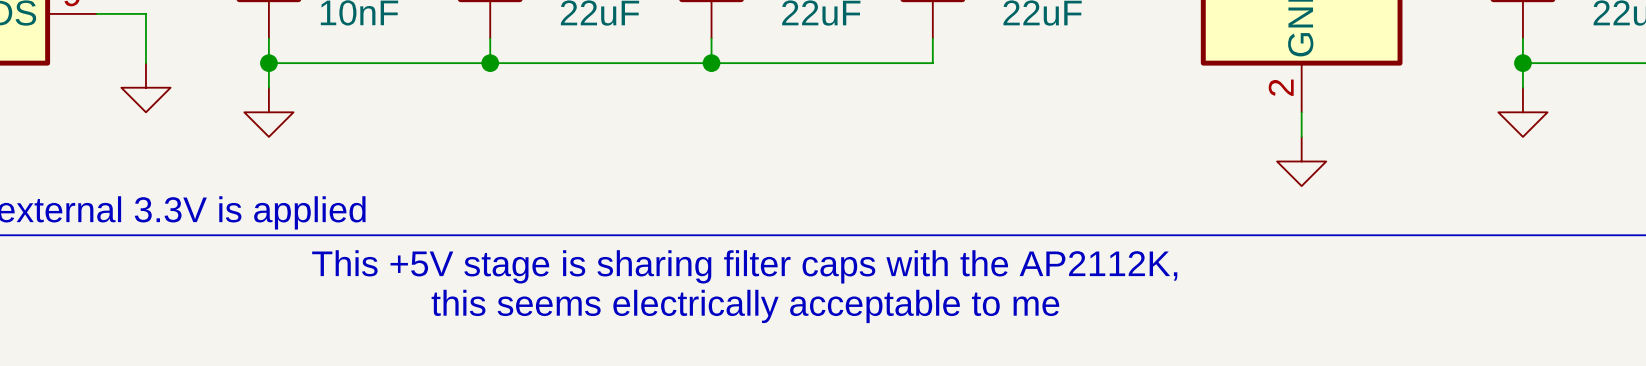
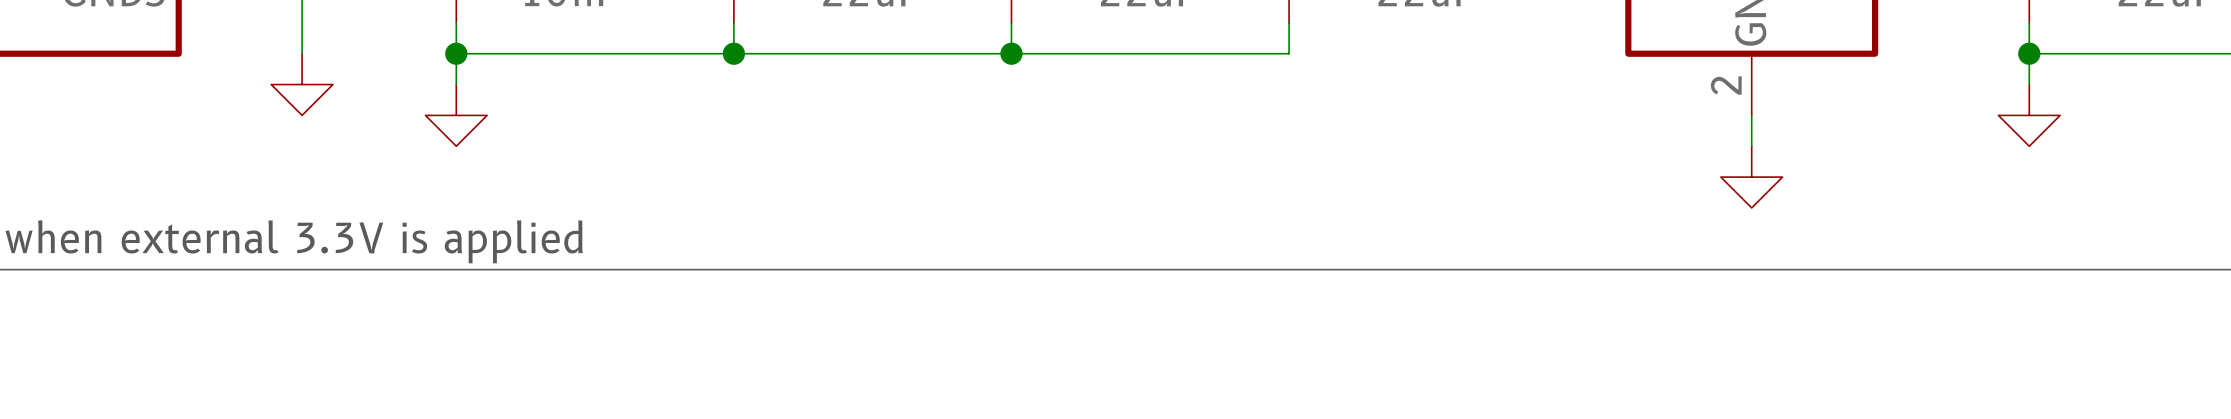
text: This +5V stage is sharing filter caps with the AP2112K, (744, 266) -> none
text: this seems electrically acceptable to me (745, 306) -> none

